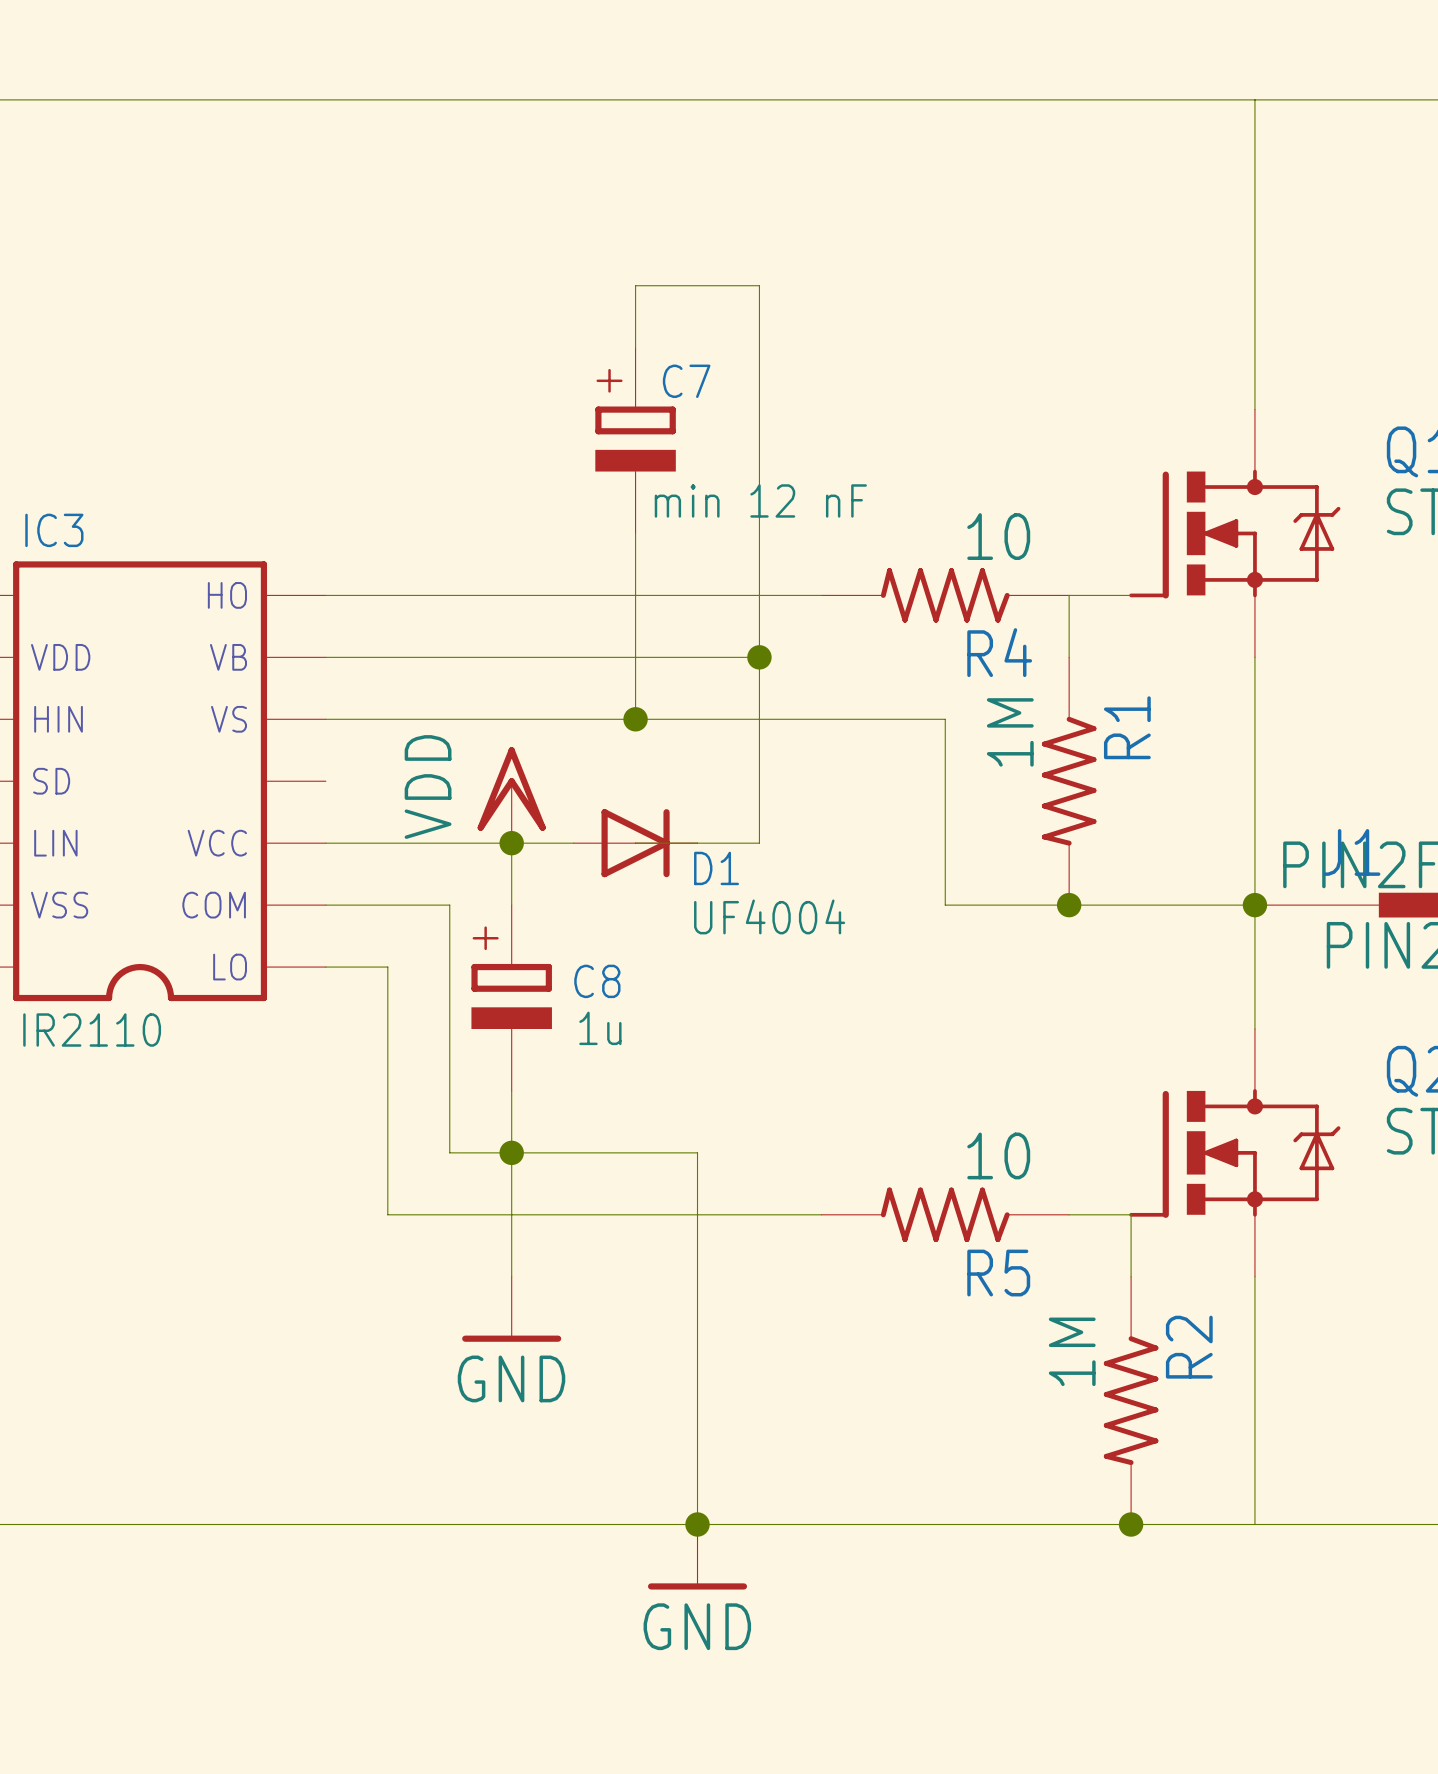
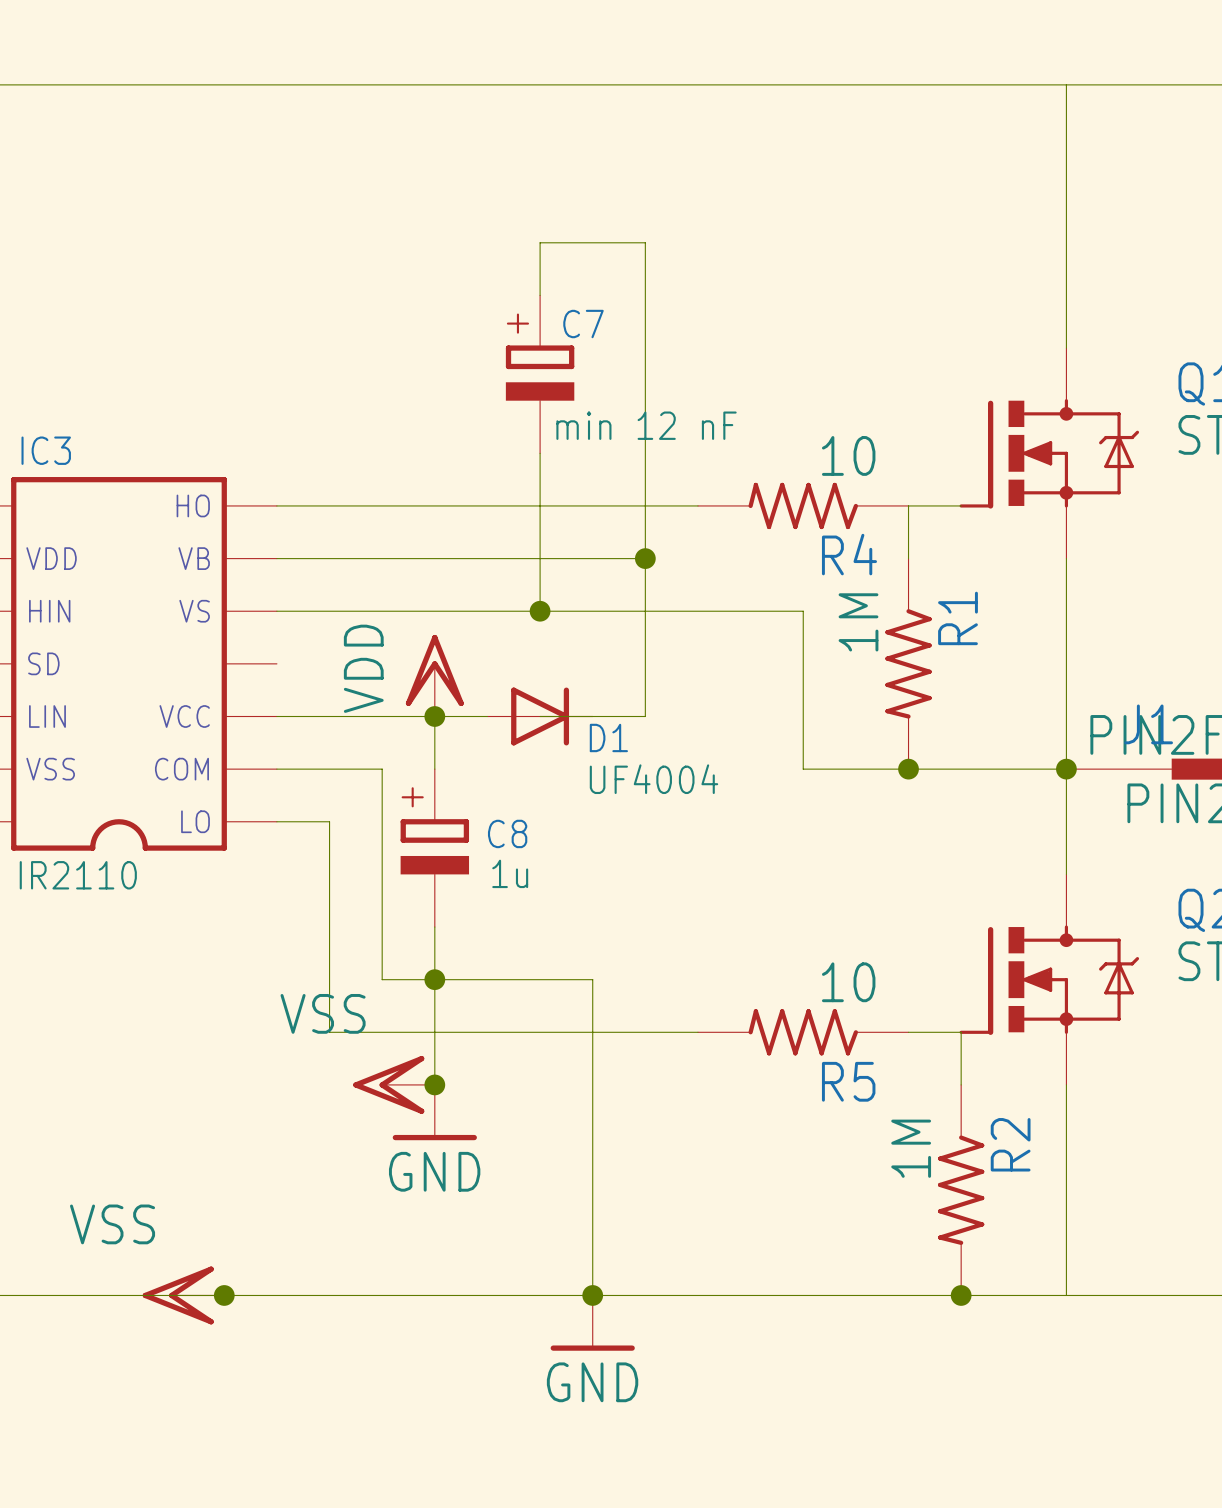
power symbol: none -> VSS (394, 1084)
junction: none -> (434, 1084)
power symbol: none -> VSS (183, 1295)
junction: none -> (224, 1295)

